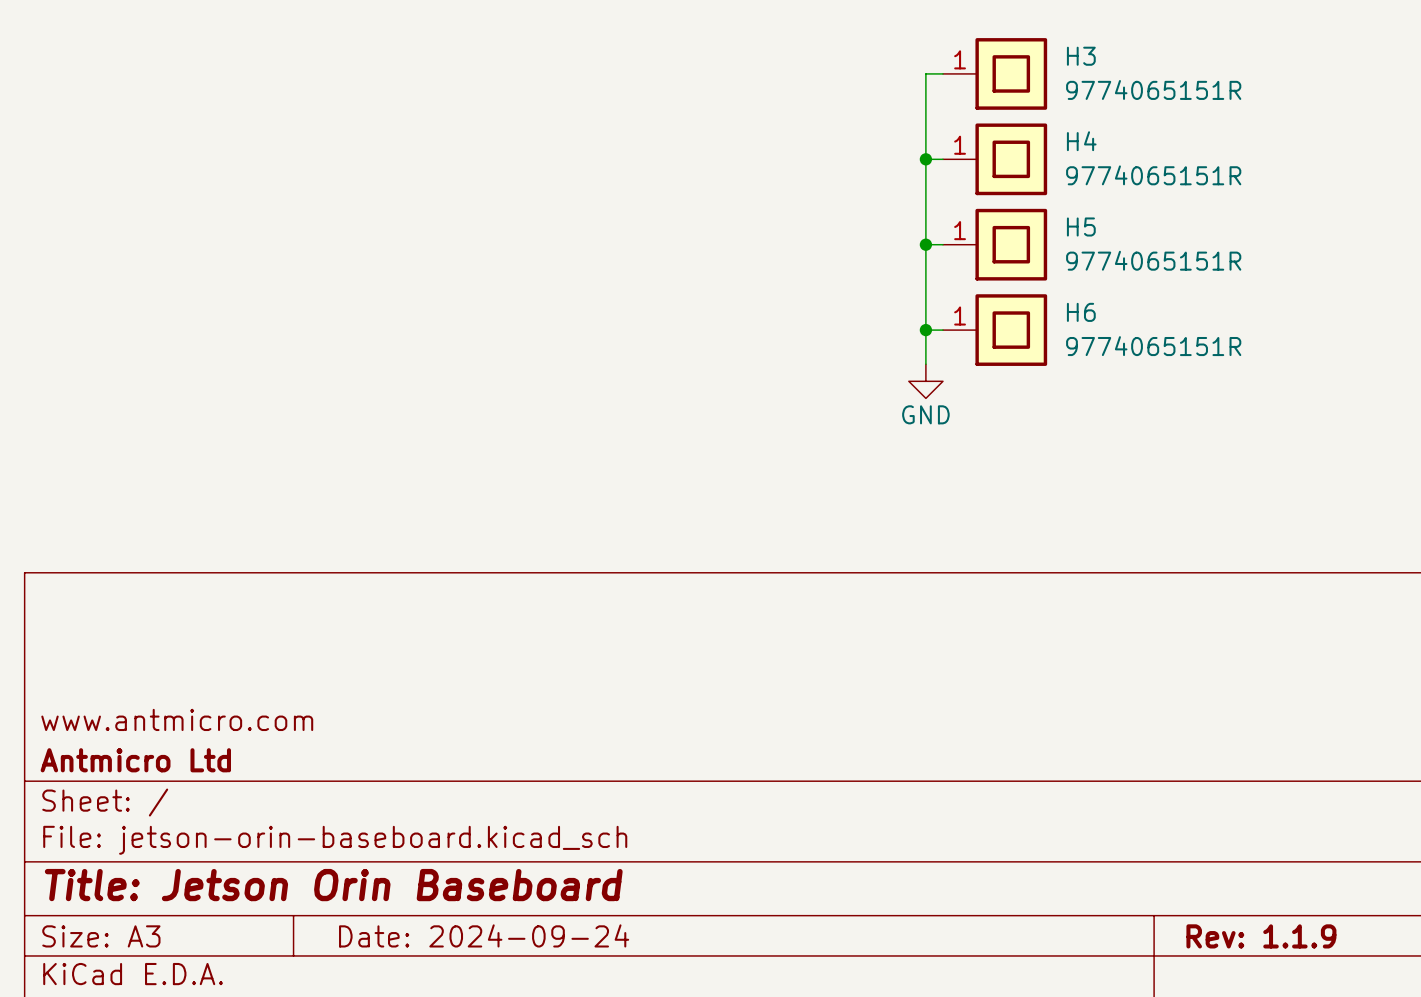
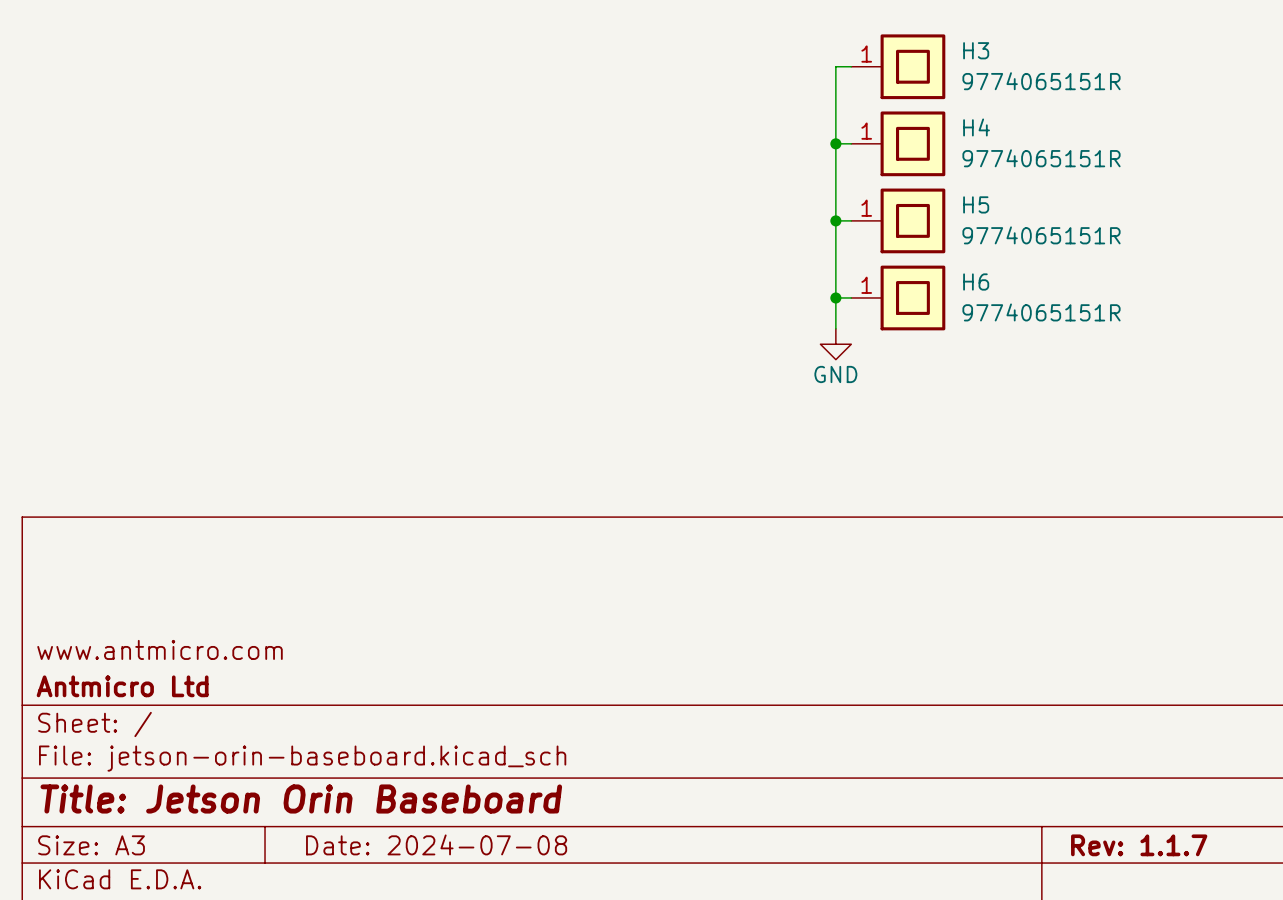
title block: Date: 2024-09-24 (484, 935) -> Date: 2024-07-08 (436, 844)
title block: Rev: 1.1.9 (1261, 936) -> Rev: 1.1.7 (1139, 845)

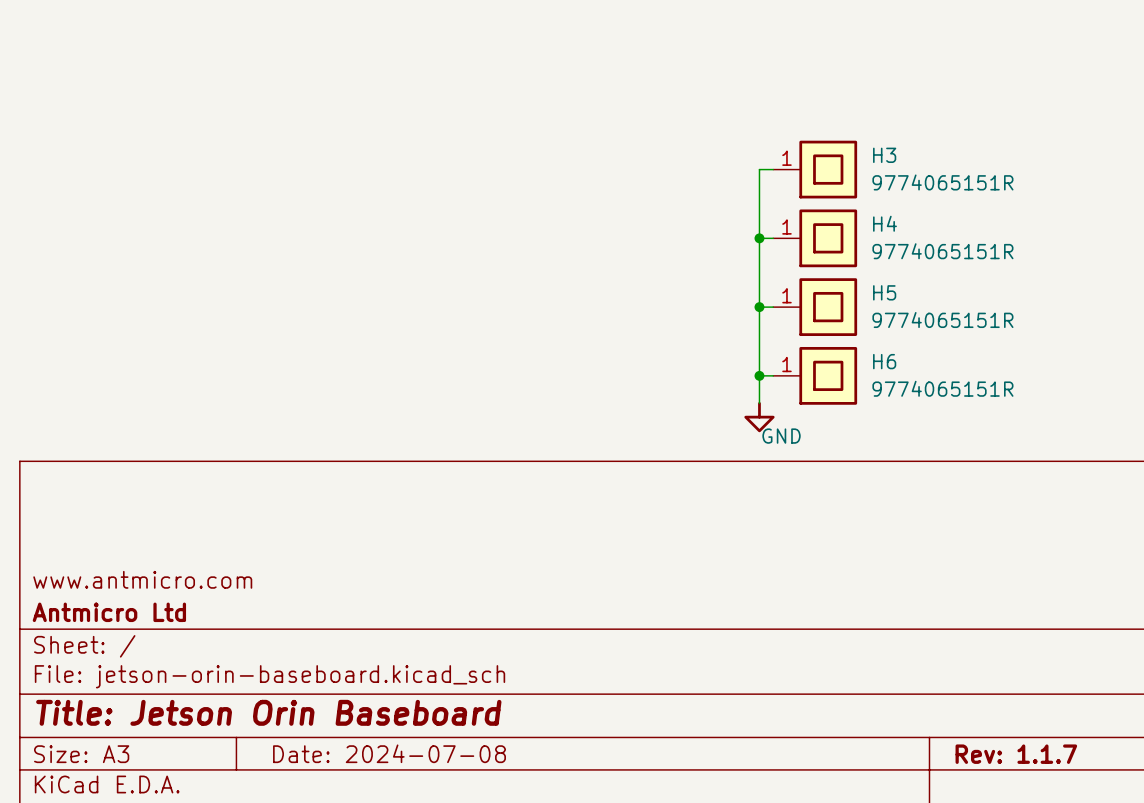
wire: (851, 66) (835, 66) (835, 328) -> (773, 169) (759, 169) (759, 403)
H3 position: (898, 66) -> (815, 169)
wire: (835, 143) (851, 143) -> (759, 238) (773, 238)
junction: (835, 143) -> none
H4 position: (898, 143) -> (815, 238)
wire: (835, 220) (851, 220) -> (759, 307) (773, 307)
junction: (835, 220) -> none
H5 position: (898, 220) -> (815, 307)
junction: none -> (759, 238)
wire: (835, 297) (851, 297) -> (759, 375) (773, 375)
junction: (835, 297) -> none
H6 position: (898, 297) -> (815, 375)
power symbol: GND (835, 344) -> none
junction: none -> (759, 307)
junction: none -> (759, 375)
power symbol: none -> GND (759, 417)

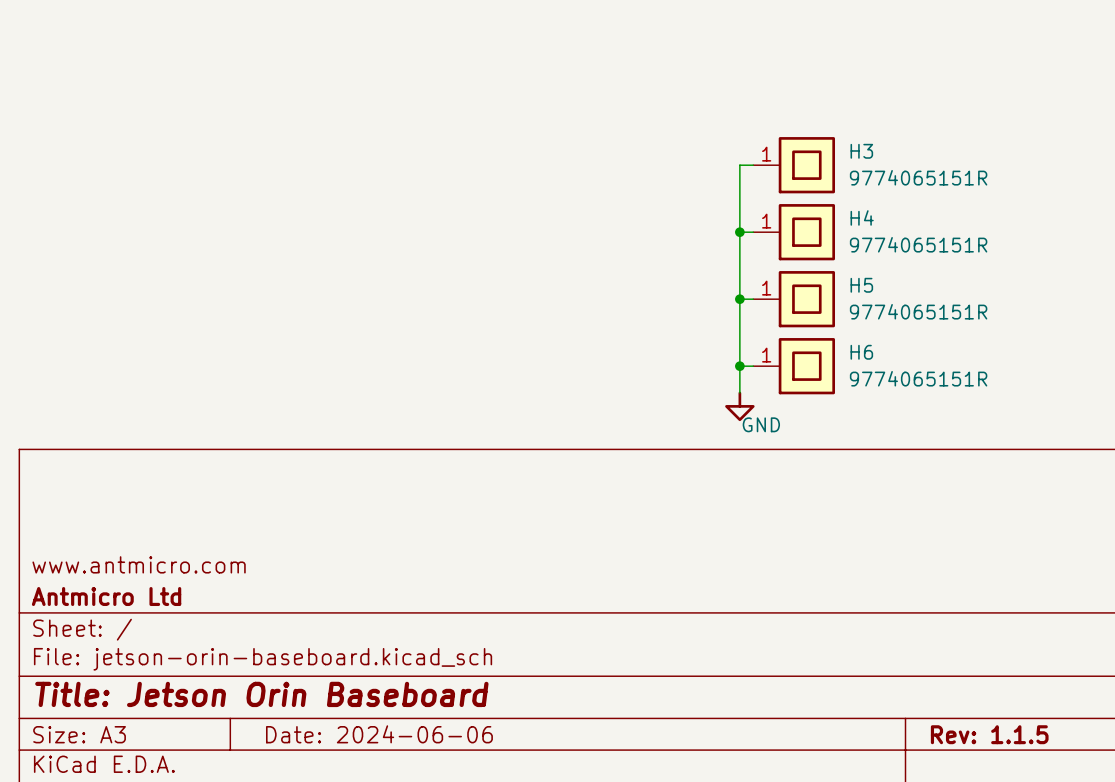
title block: Date: 2024-07-08 (389, 753) -> Date: 2024-06-06 (379, 734)
title block: Rev: 1.1.7 (1016, 754) -> Rev: 1.1.5 (989, 734)

